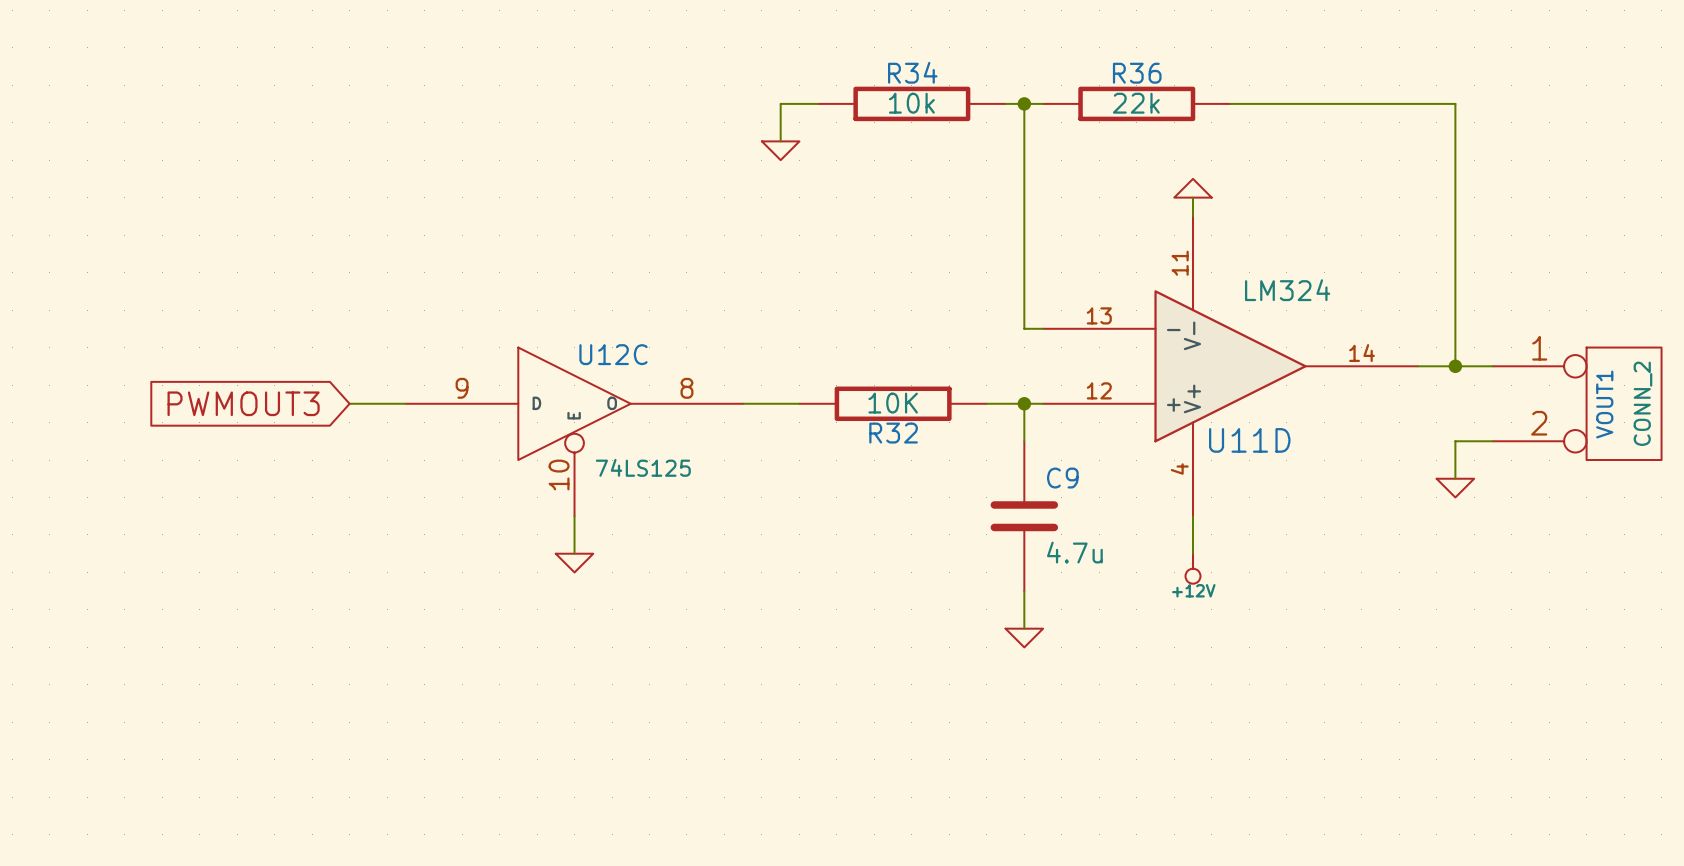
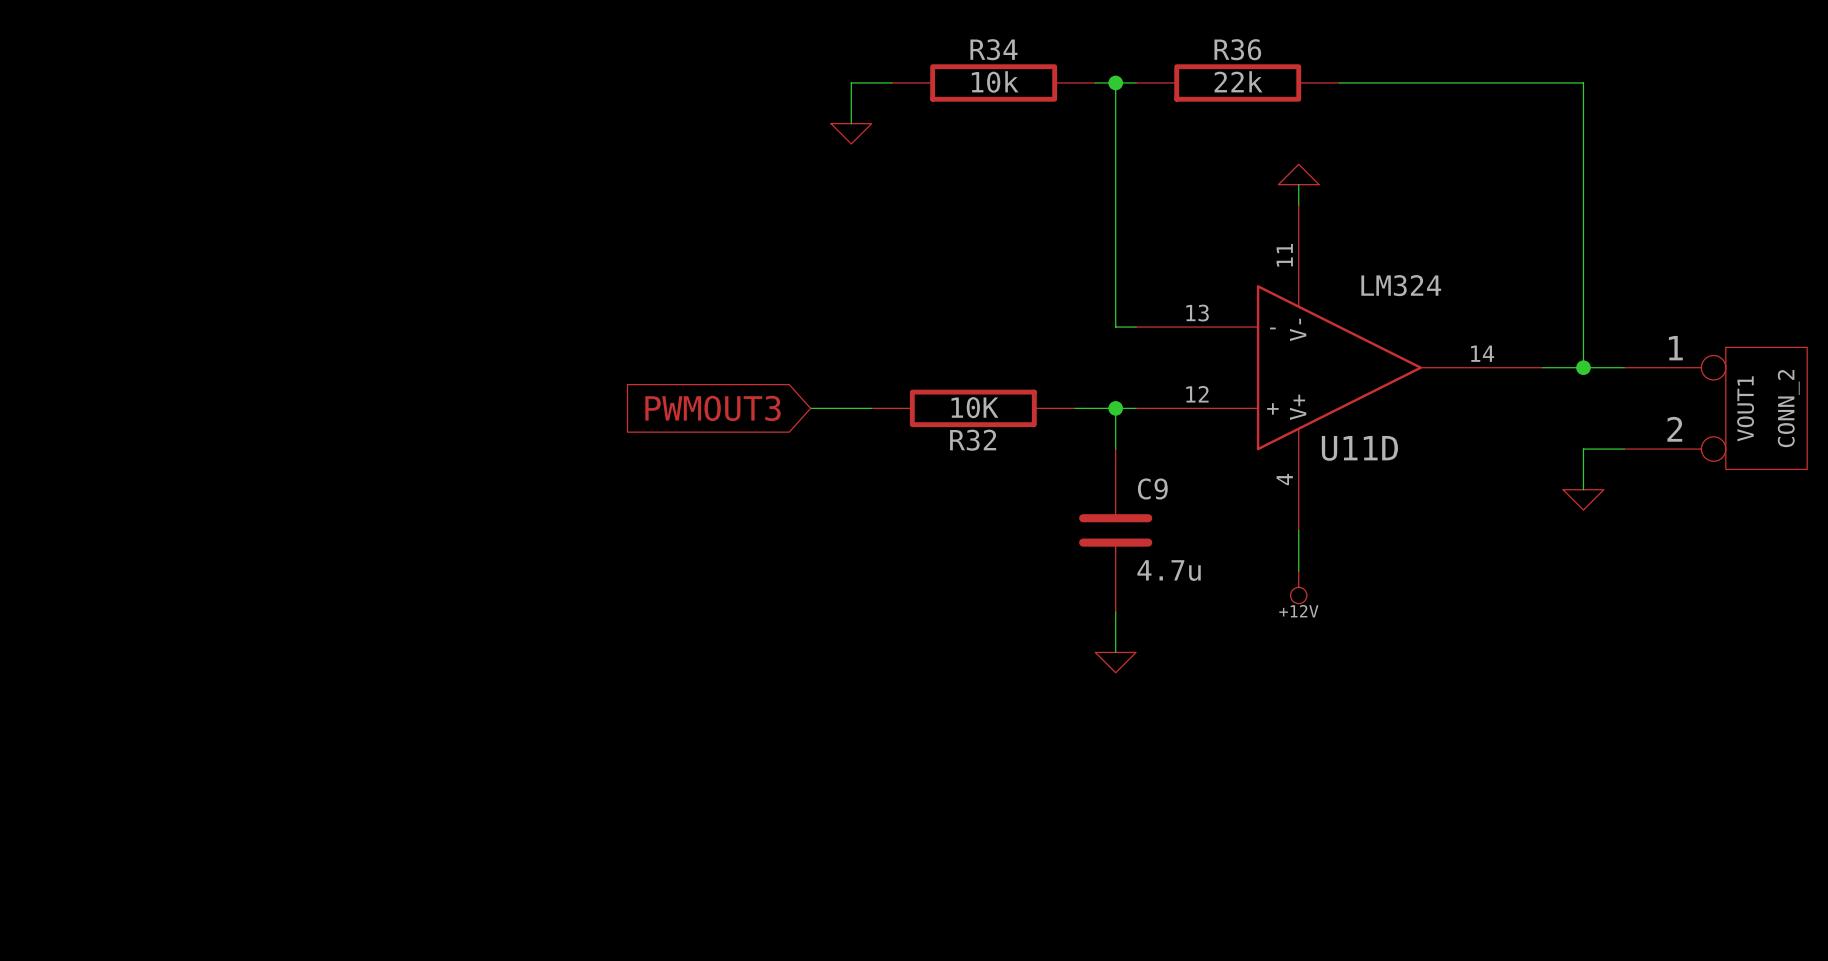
global label: PWMOUT3 (243, 403) -> none
wire: (349, 403) (405, 403) -> none
global label: none -> PWMOUT3 (712, 408)
U12C: 74LS125 (574, 431) -> none
wire: (574, 516) (574, 553) -> none
power symbol: (574, 563) -> none

